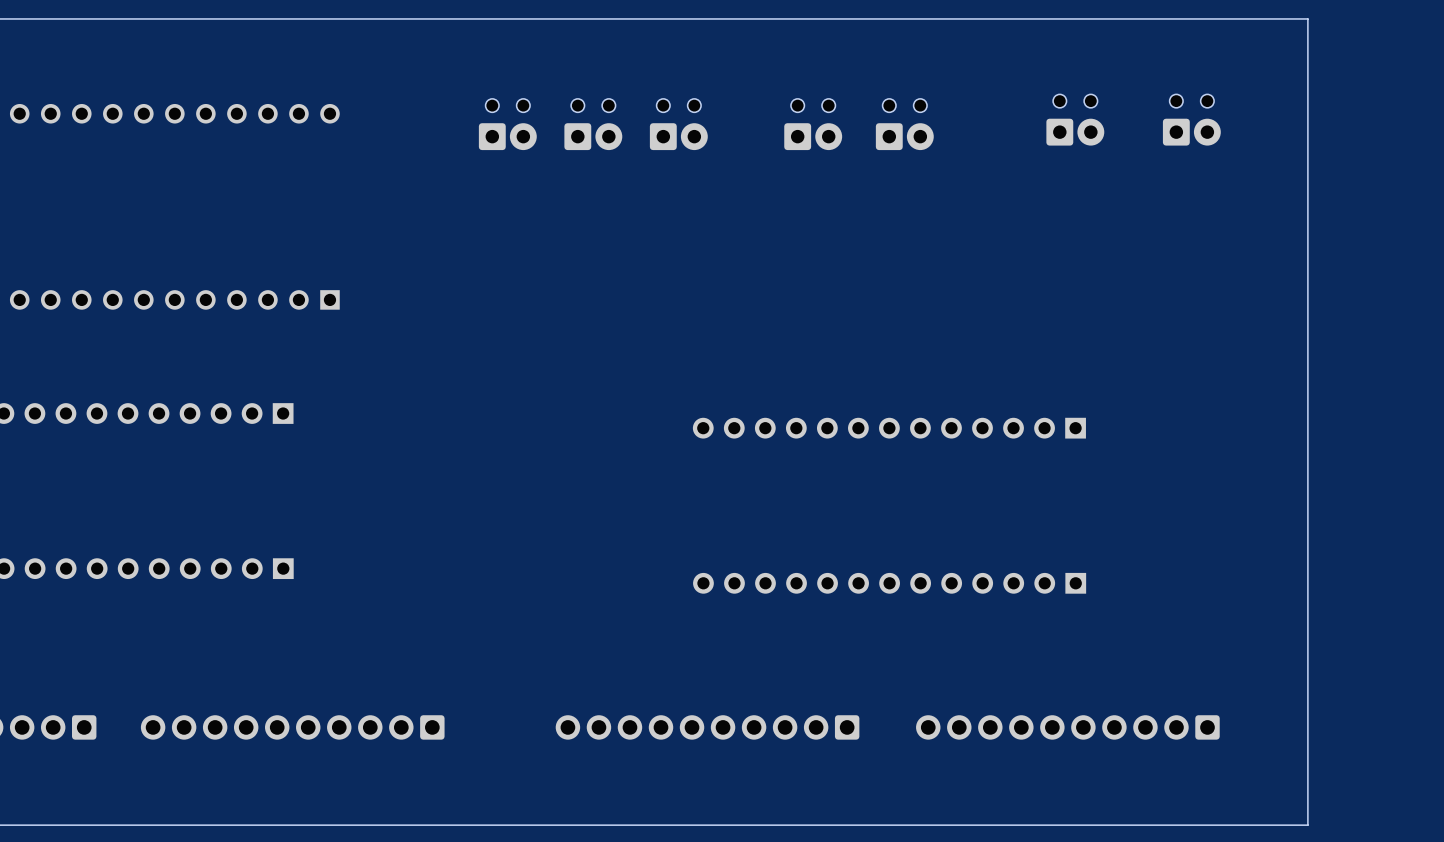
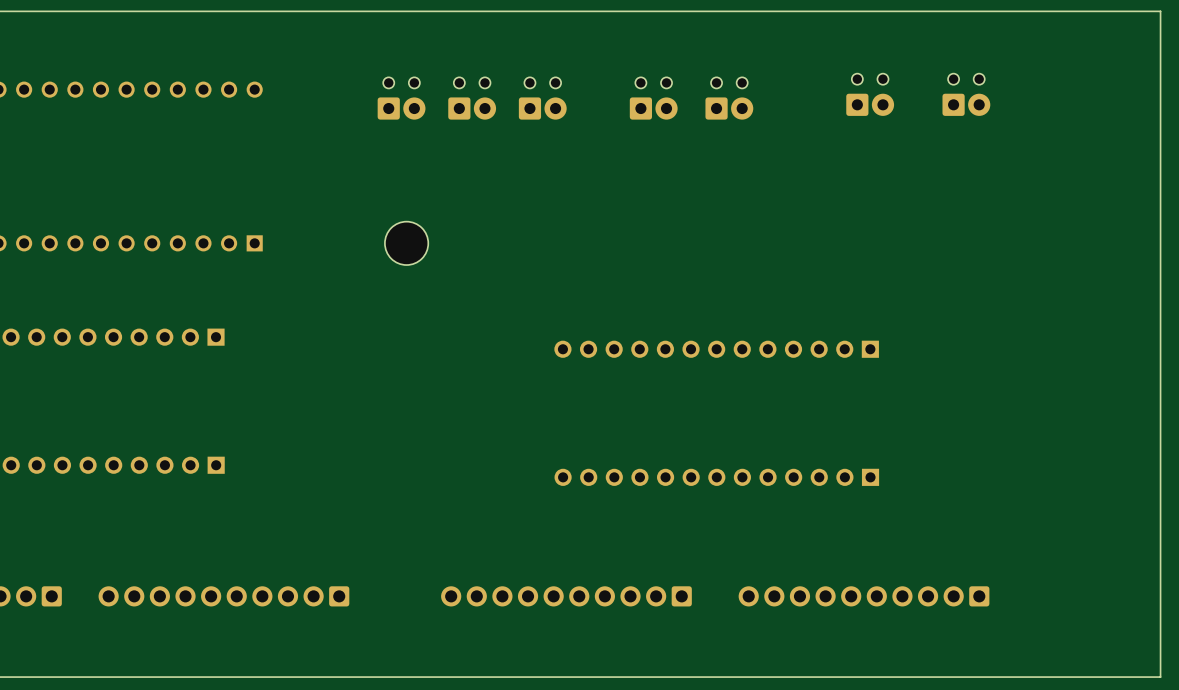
board edge: (1307, 18) (1307, 825) -> (1062, 11) (1160, 11) (1160, 677) (1062, 677)
part: none -> (406, 243)

